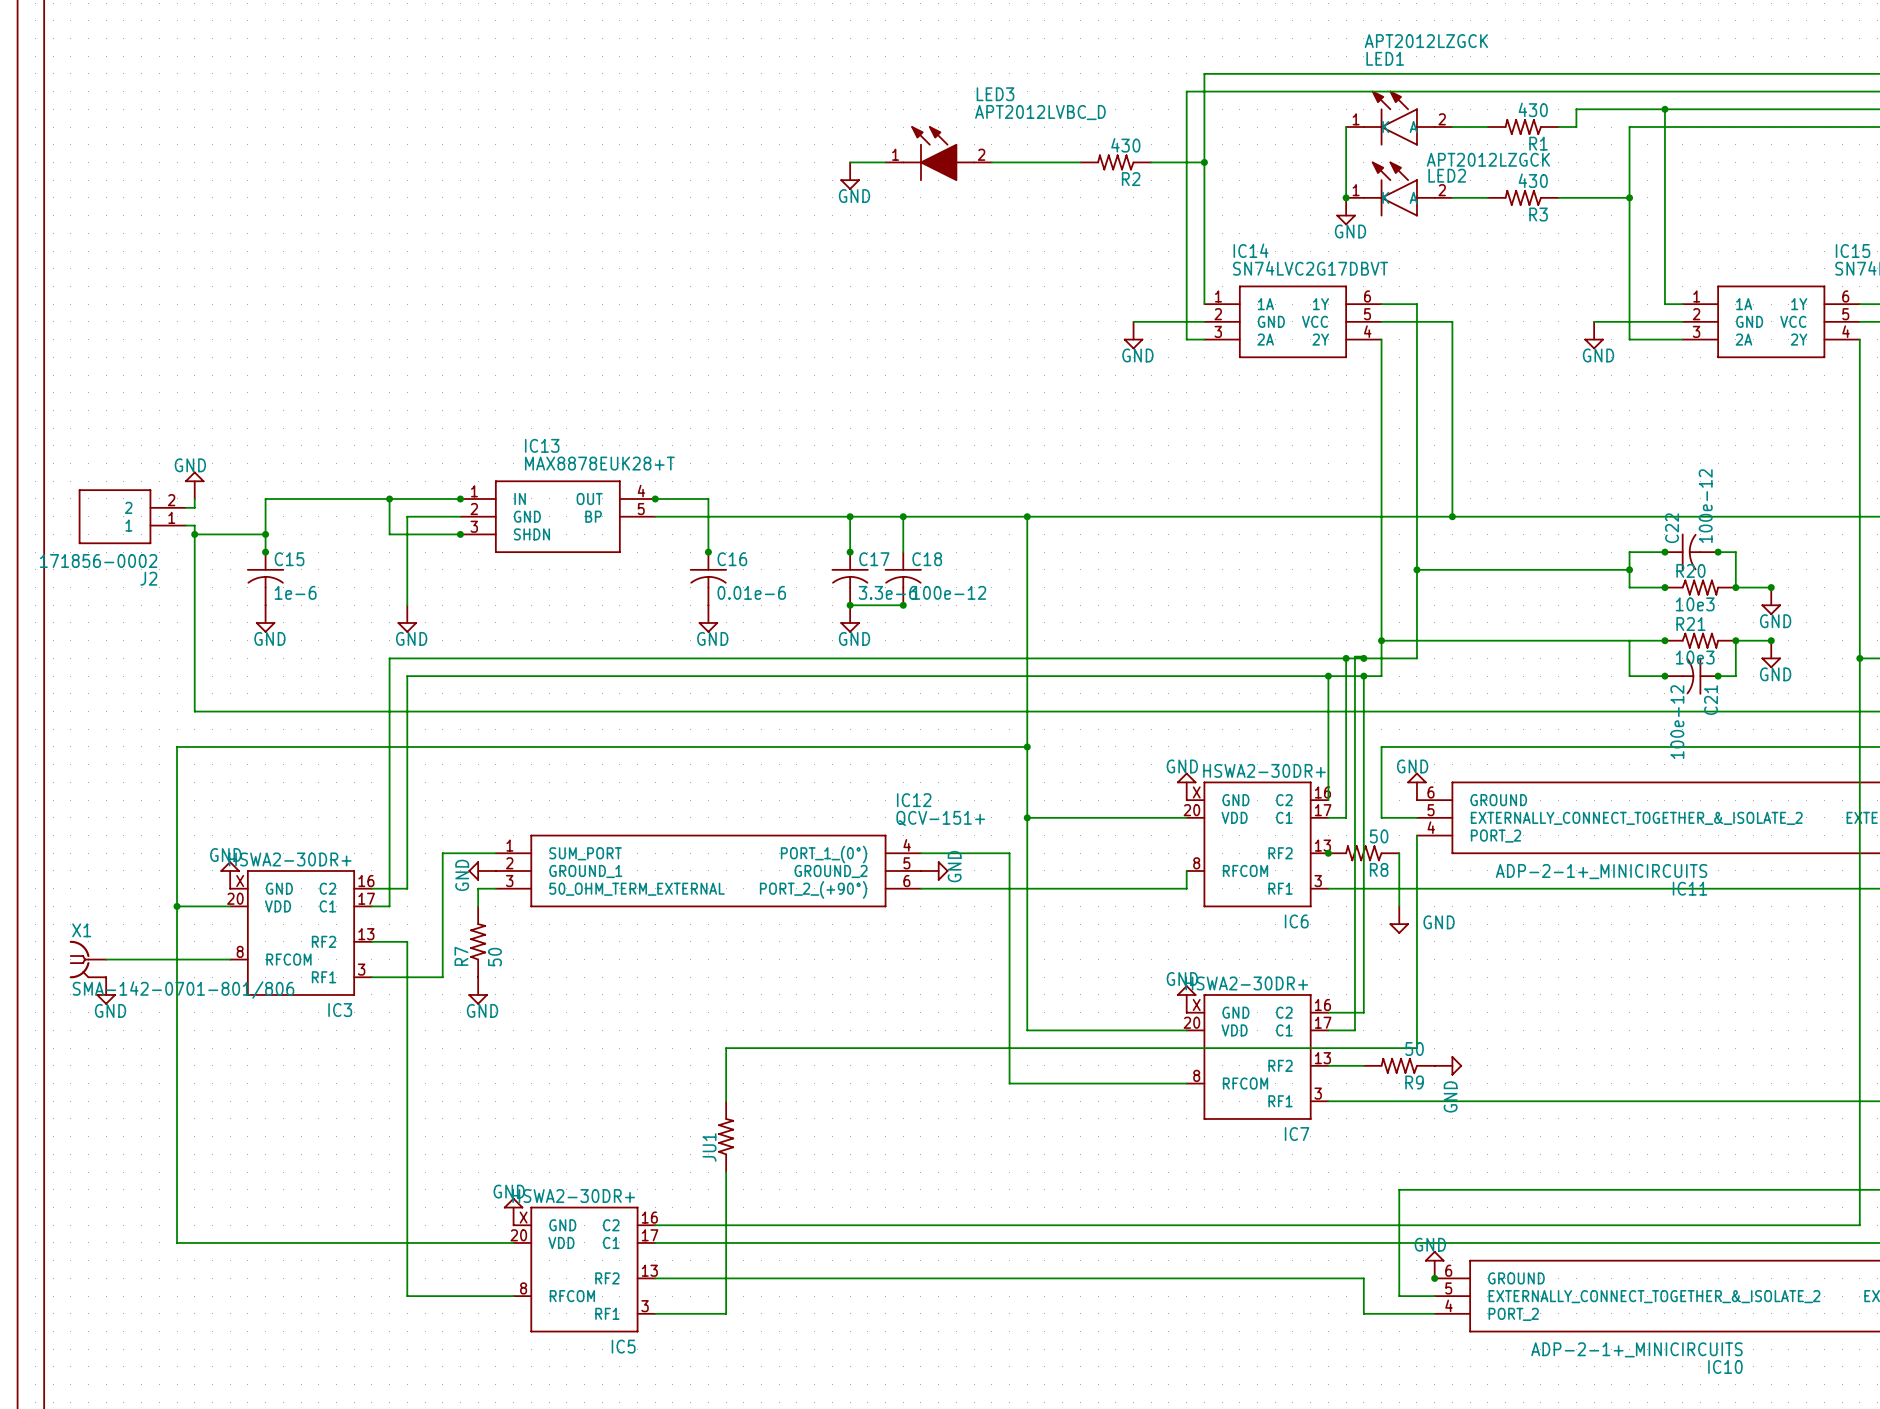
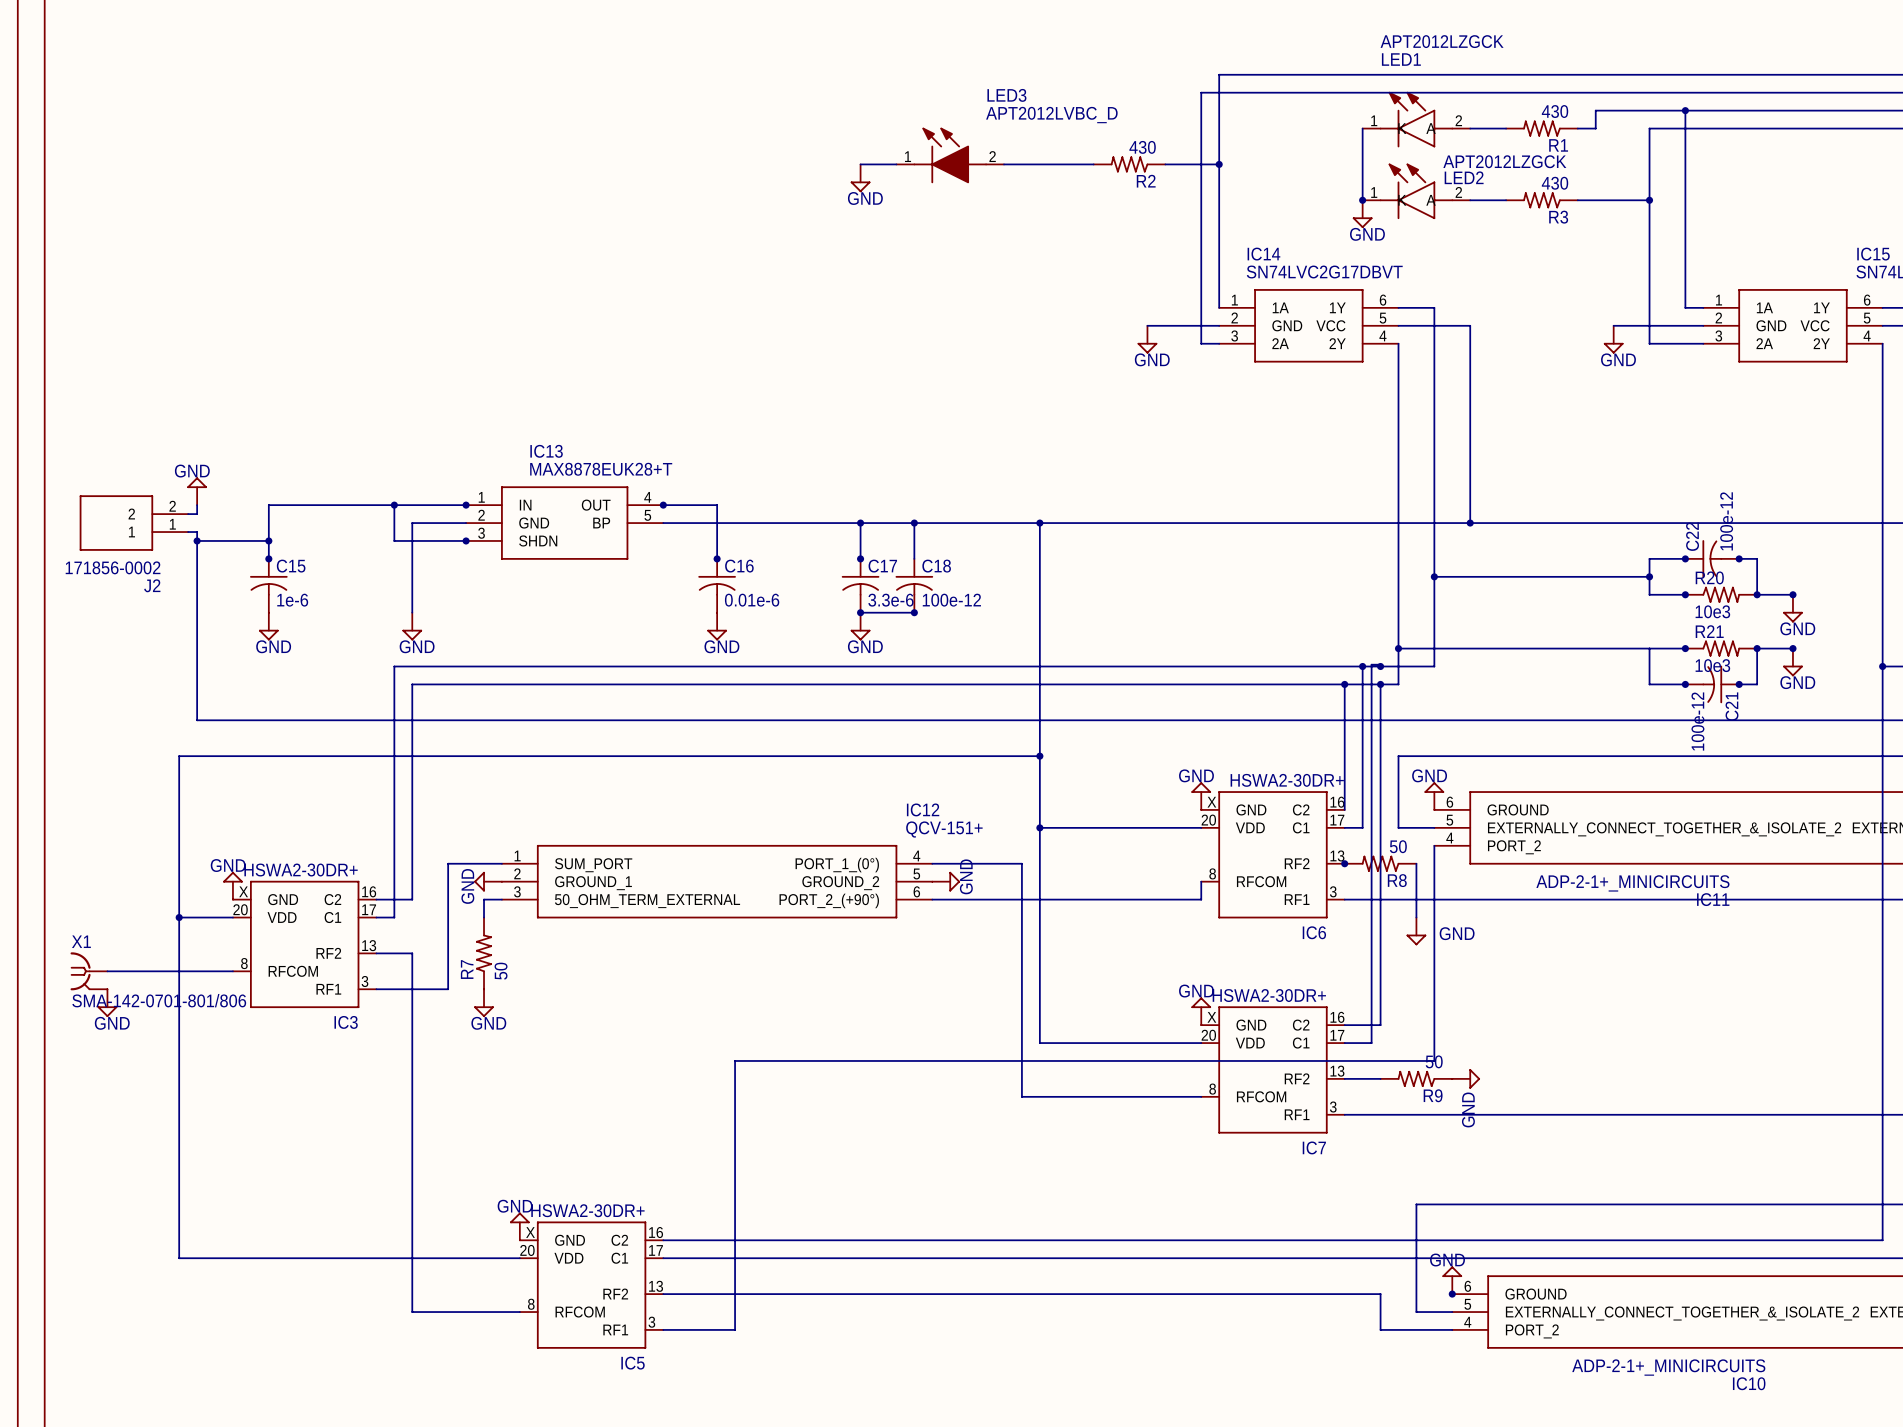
JU1: (726, 1136) -> none

